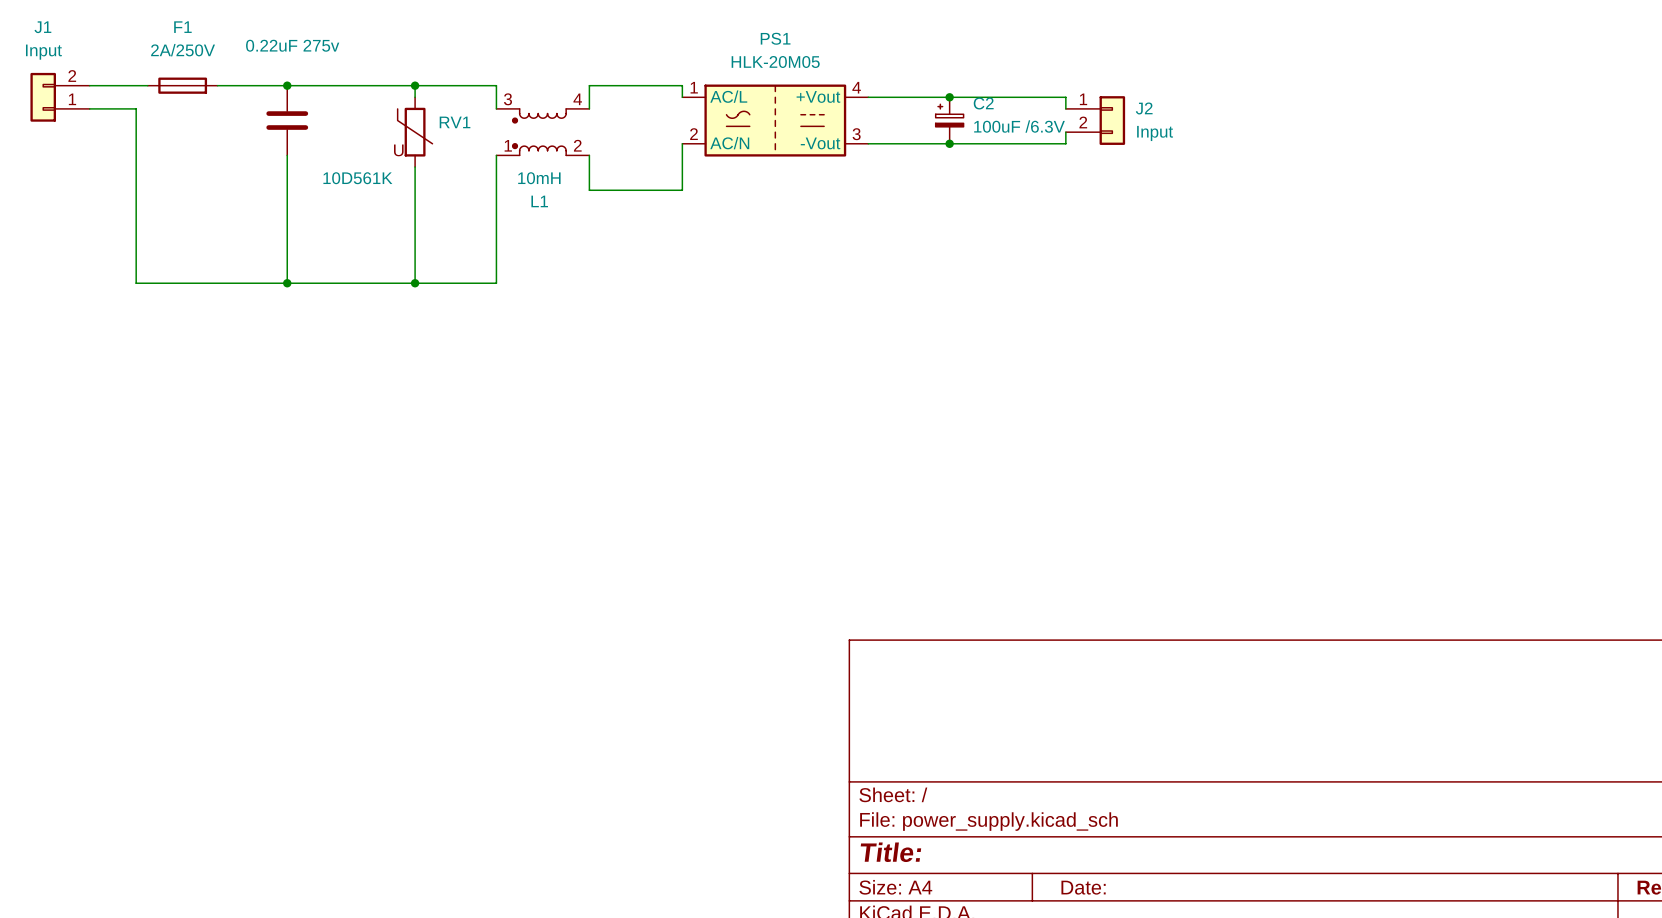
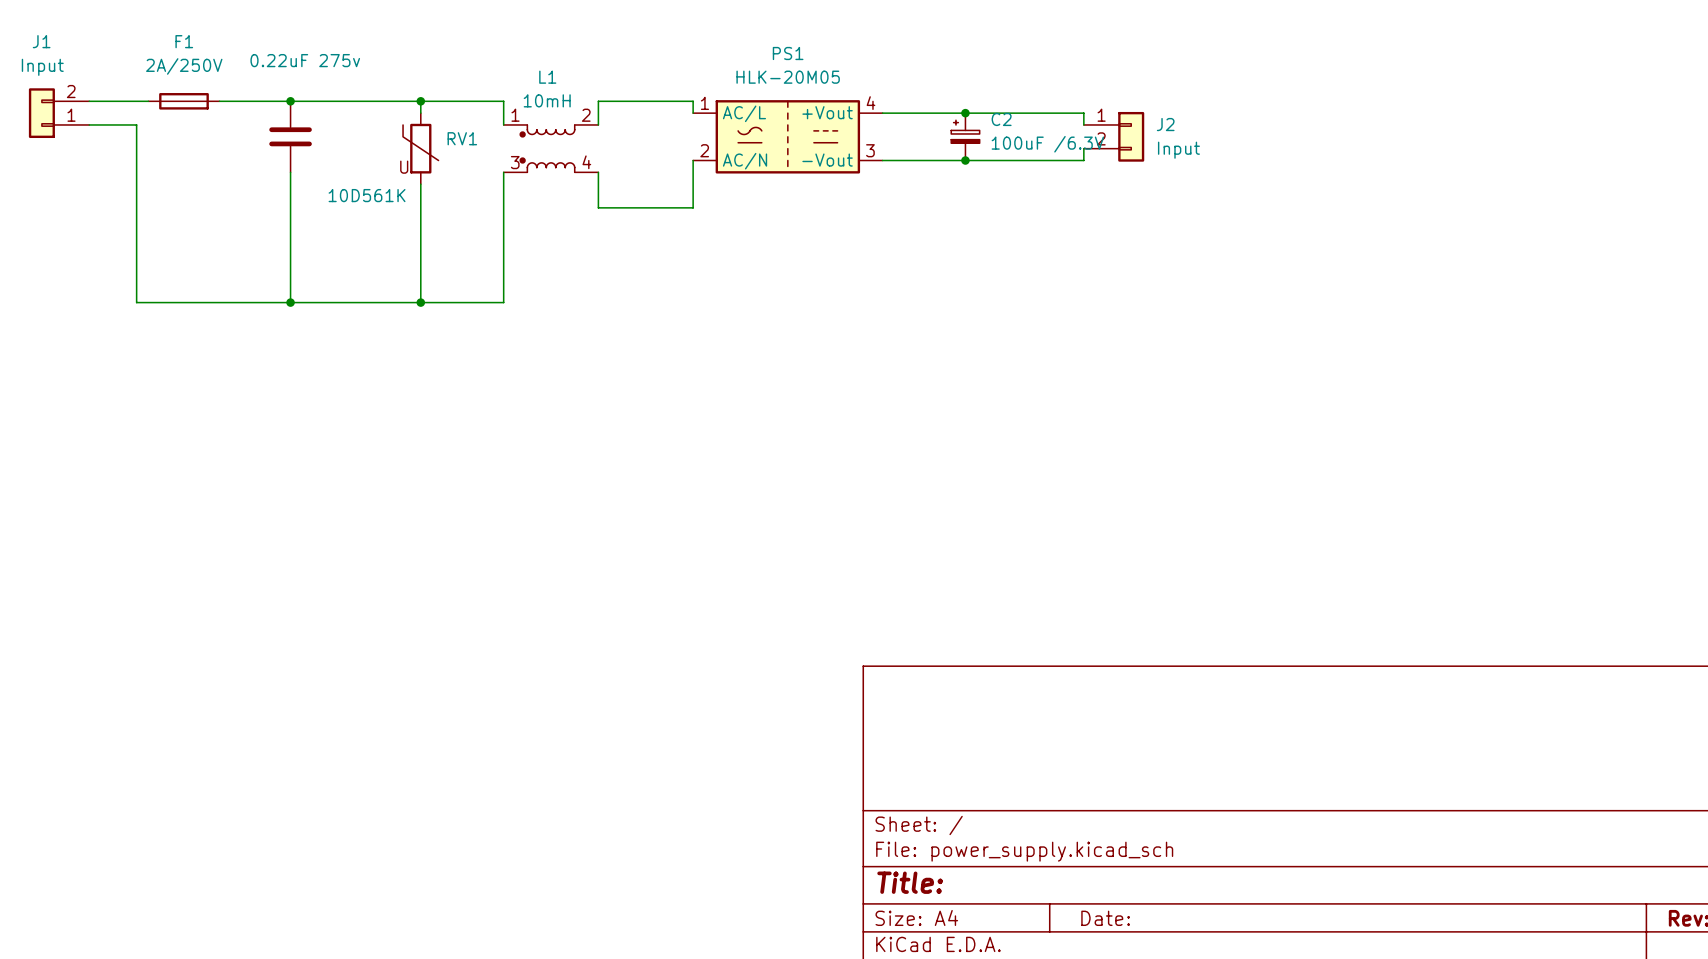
L1 flip: as is (539, 132) -> up-down (547, 148)

